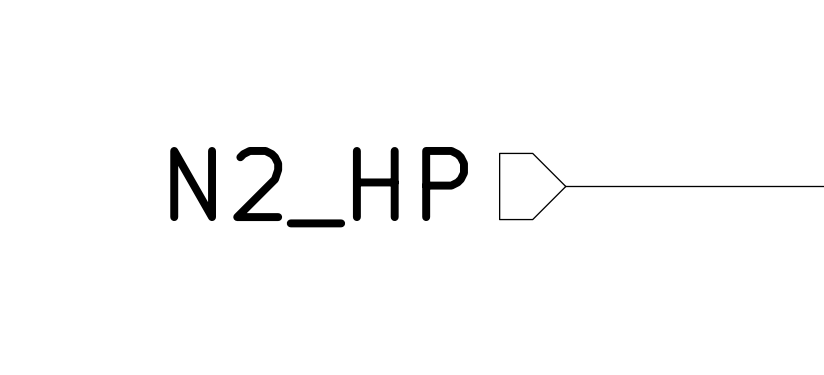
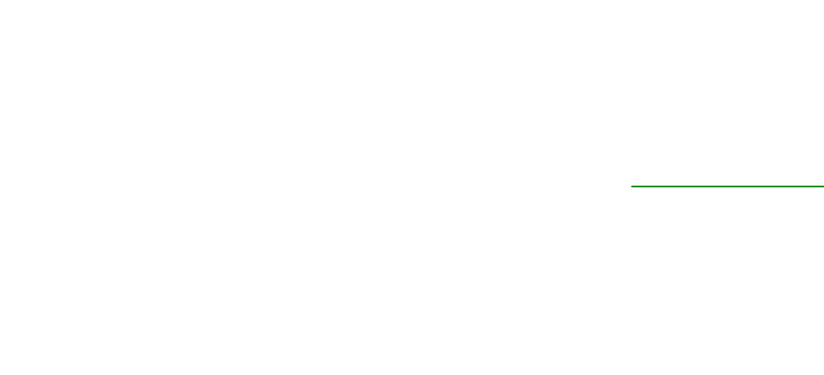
wire: (565, 186) (631, 186) -> none
hierarchical label: N2_HP (319, 187) -> none

